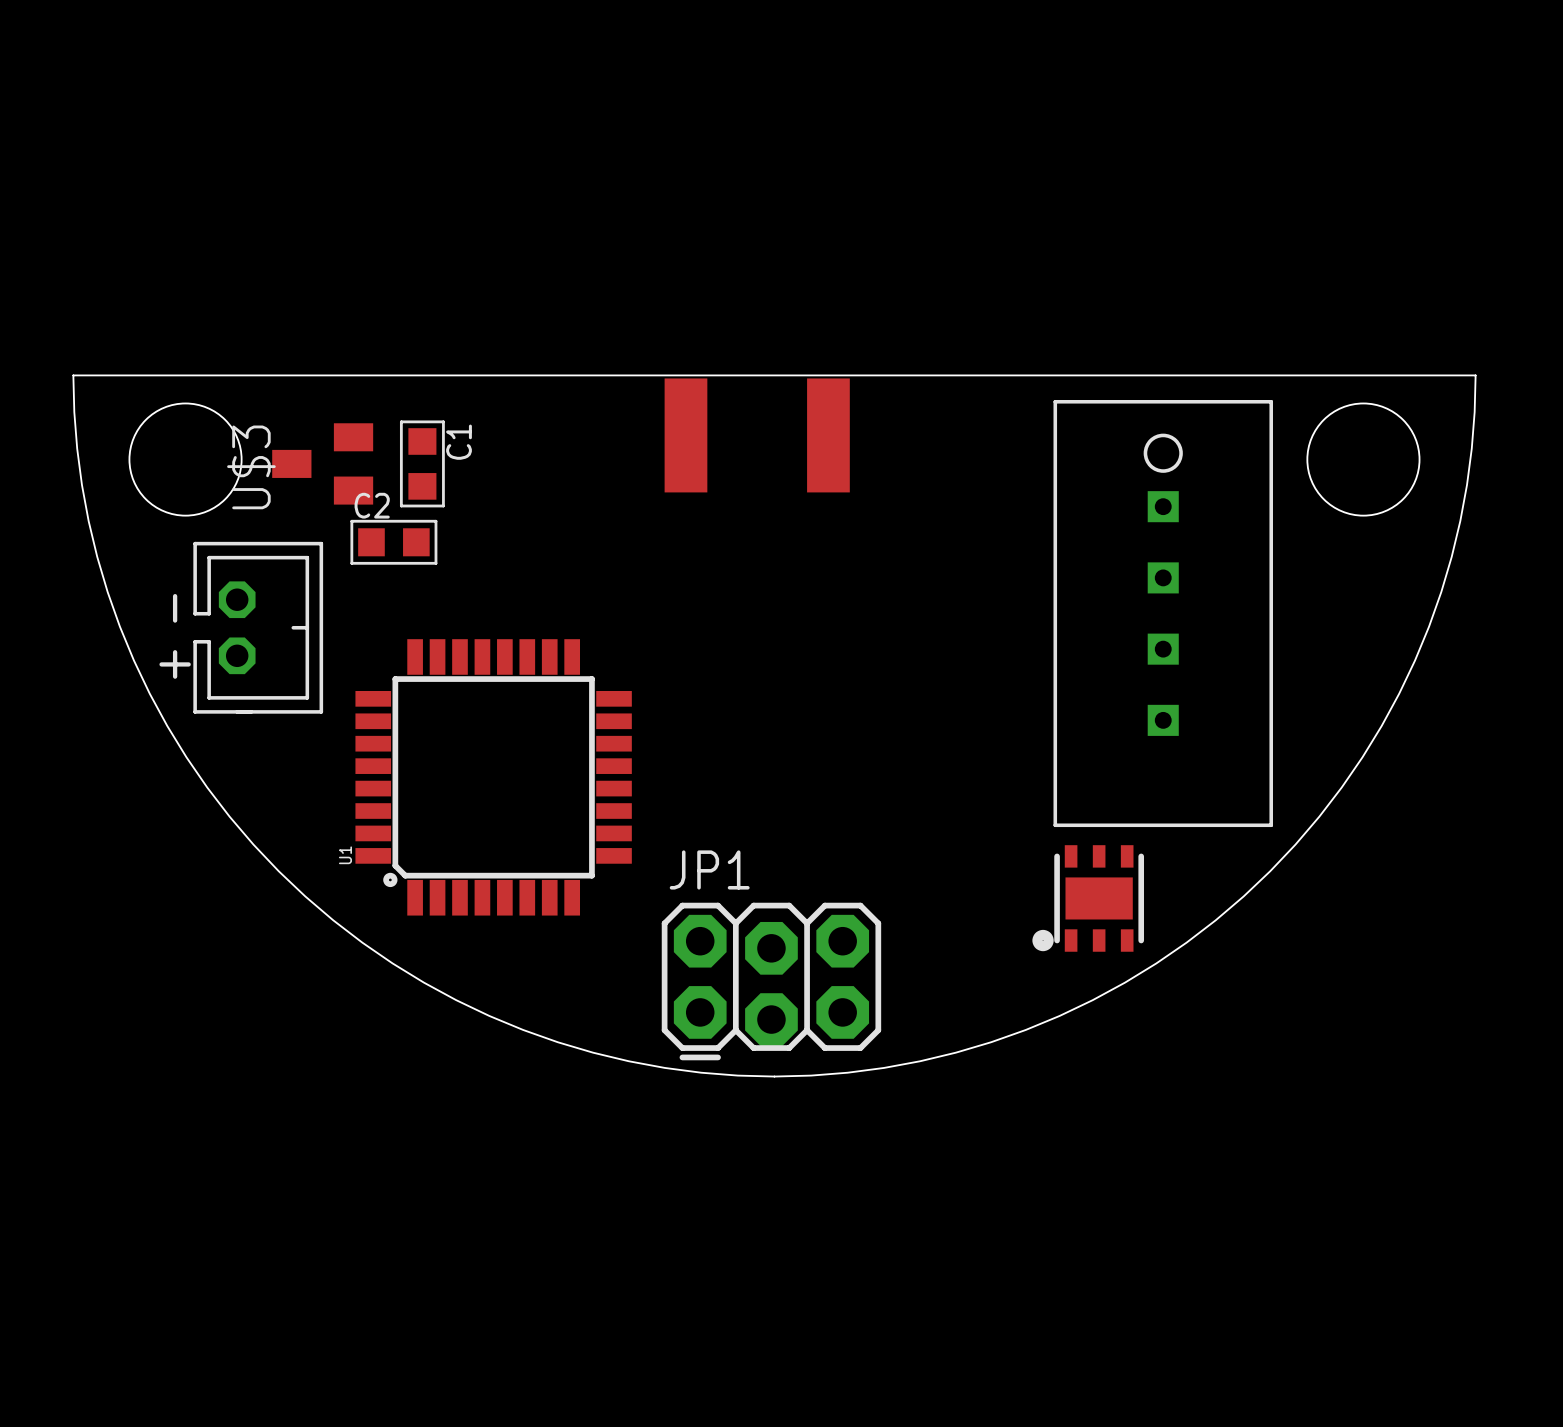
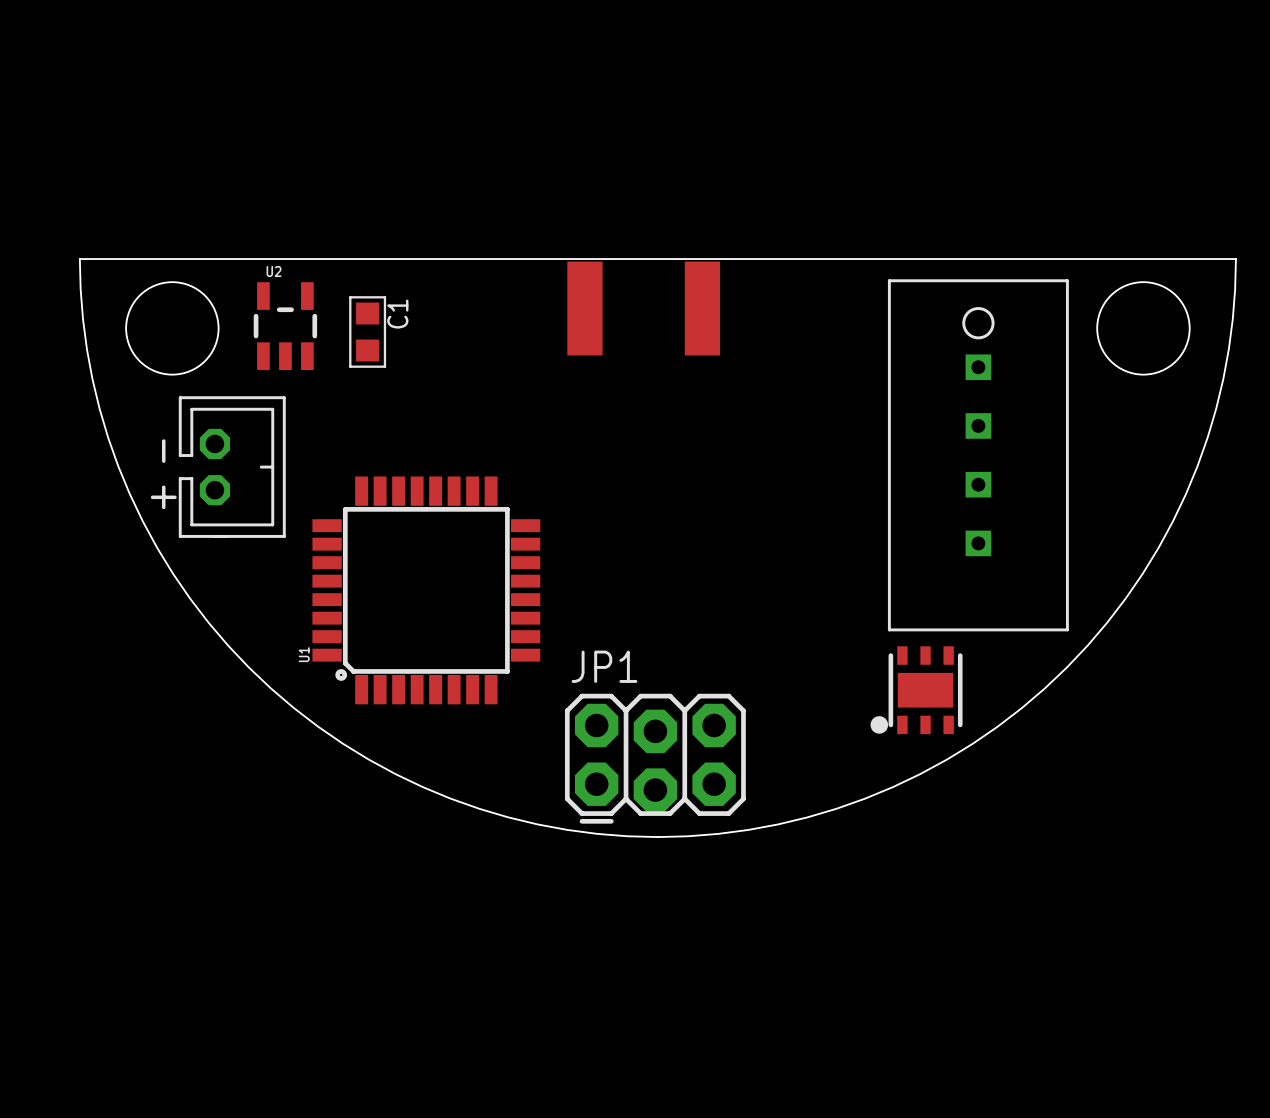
U2: none -> (285, 326)
U$3: (322, 463) -> none
C2: (393, 542) -> none

